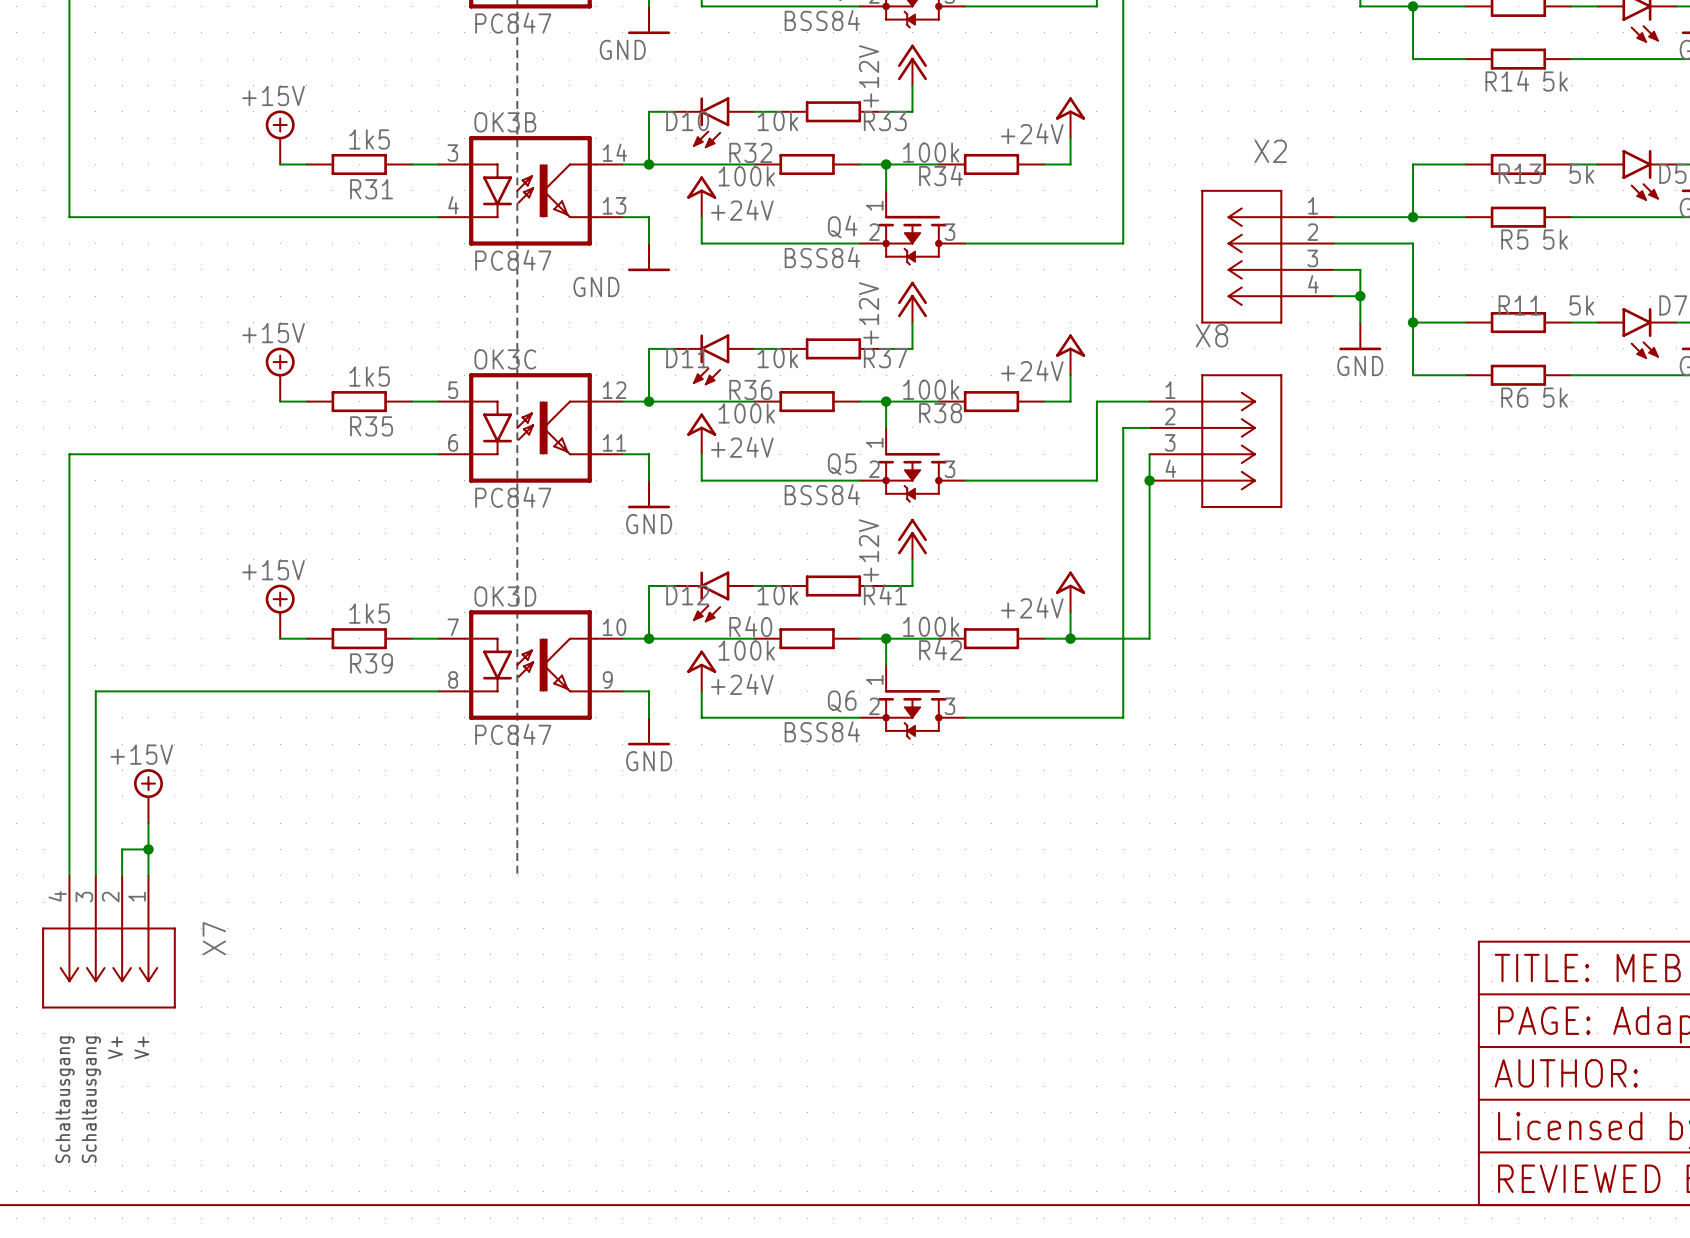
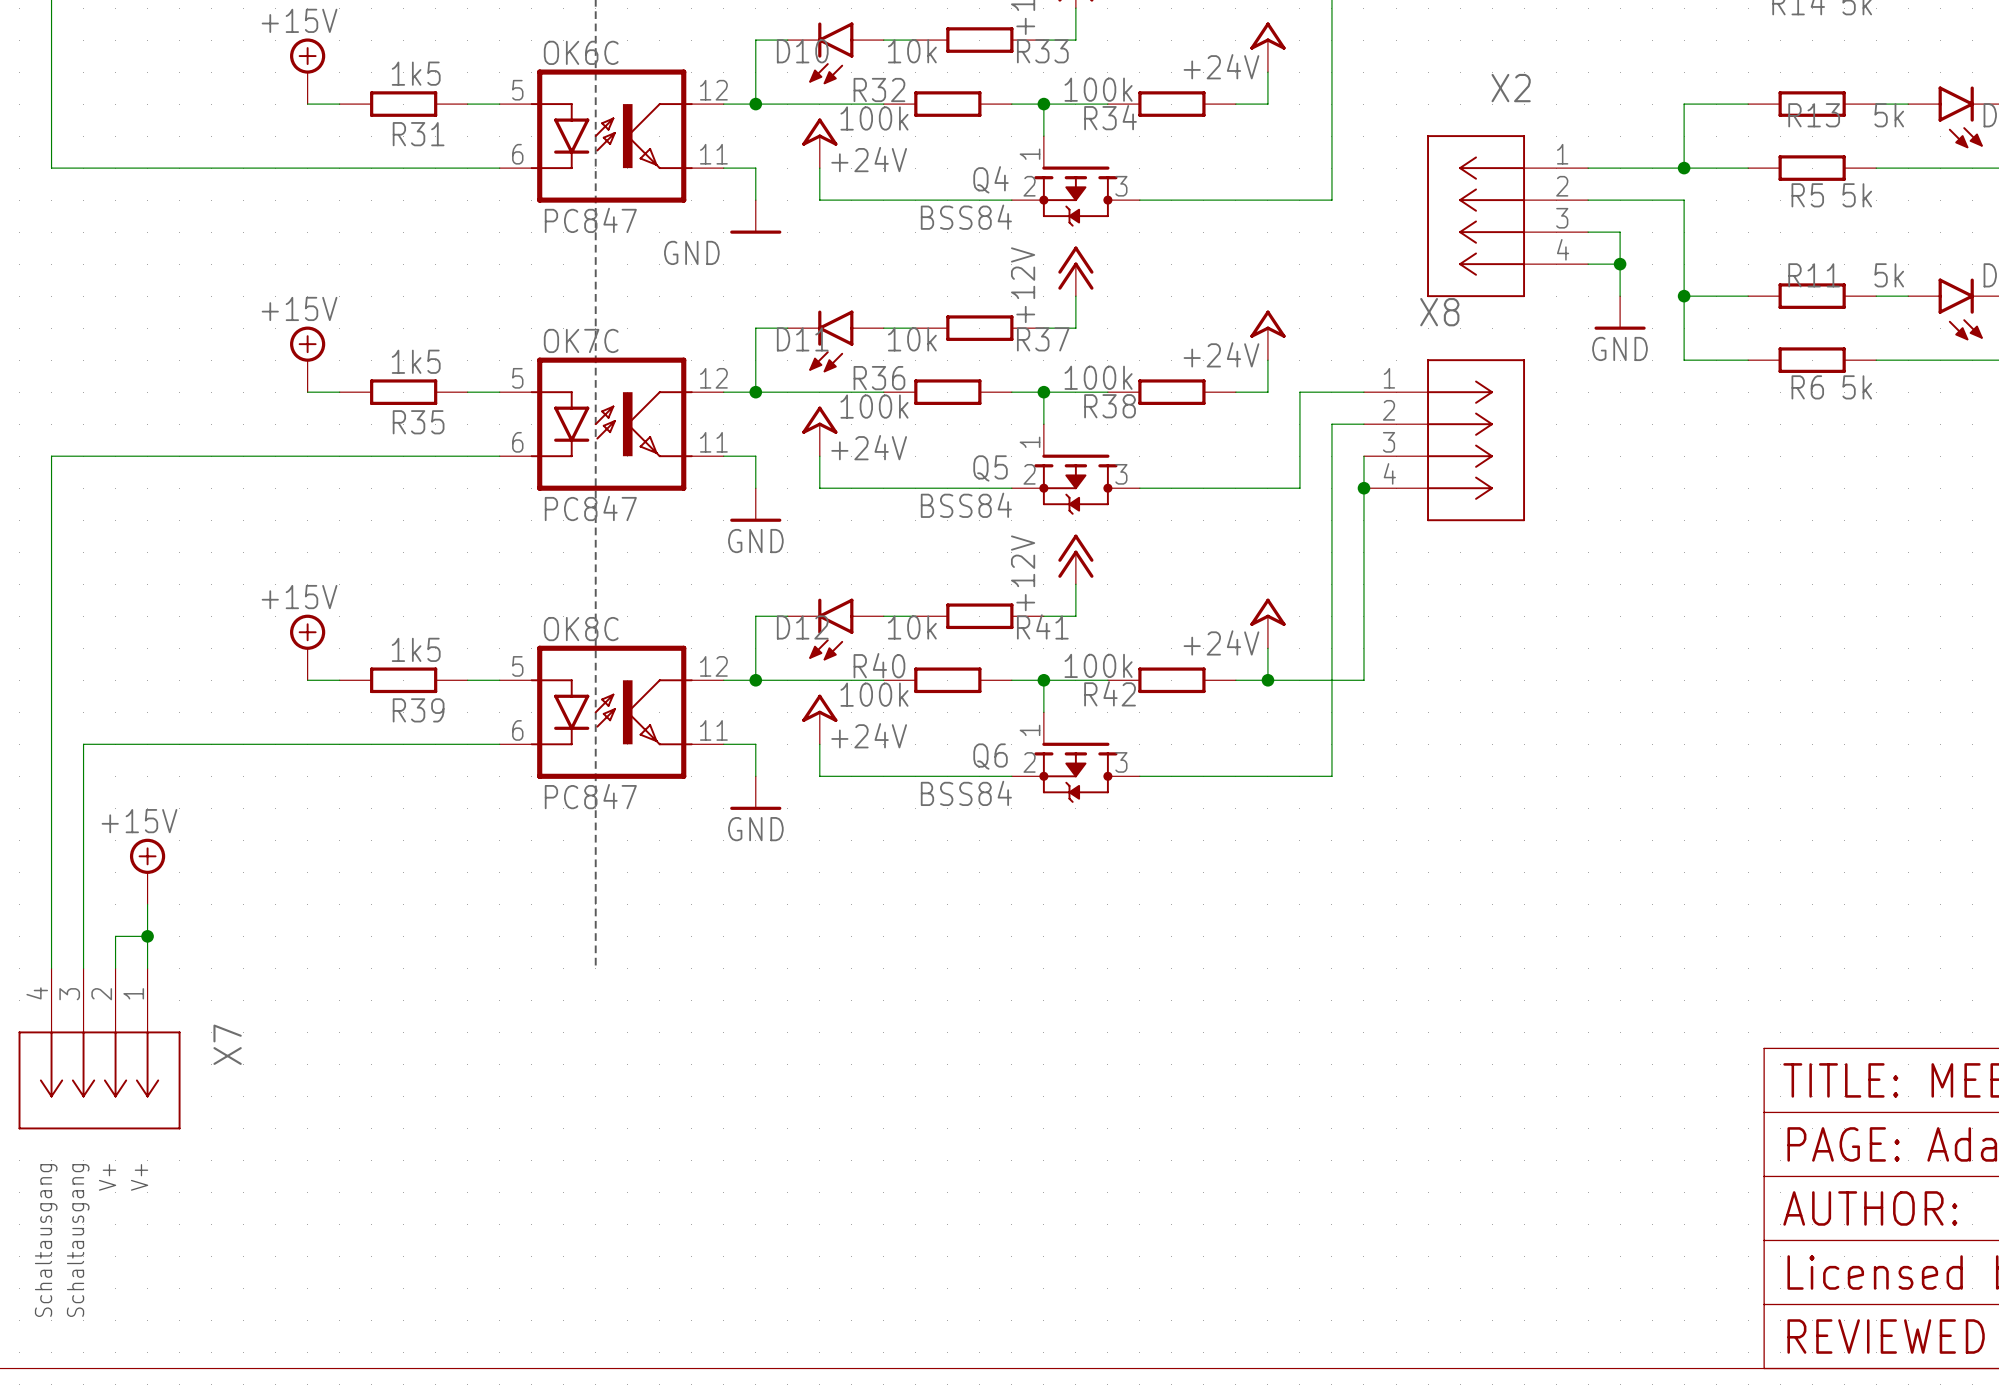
OK3B name: OK3B (505, 122) -> OK6C (581, 52)
OK3B pin number: 14 (614, 152) -> 12 (713, 90)
OK3B pin number: 3 (452, 153) -> 5 (517, 90)
OK3B pin number: 4 (453, 205) -> 6 (517, 154)
OK3B pin number: 13 (614, 205) -> 11 (713, 154)
OK3C name: OK3C (505, 359) -> OK7C (581, 340)
OK3D name: OK3D (505, 596) -> OK8C (581, 629)
OK3D pin number: 7 (453, 627) -> 5 (517, 666)
OK3D pin number: 10 (614, 627) -> 12 (713, 666)
OK3D pin number: 8 (453, 679) -> 6 (517, 730)
OK3D pin number: 9 (607, 679) -> 11 (713, 730)

